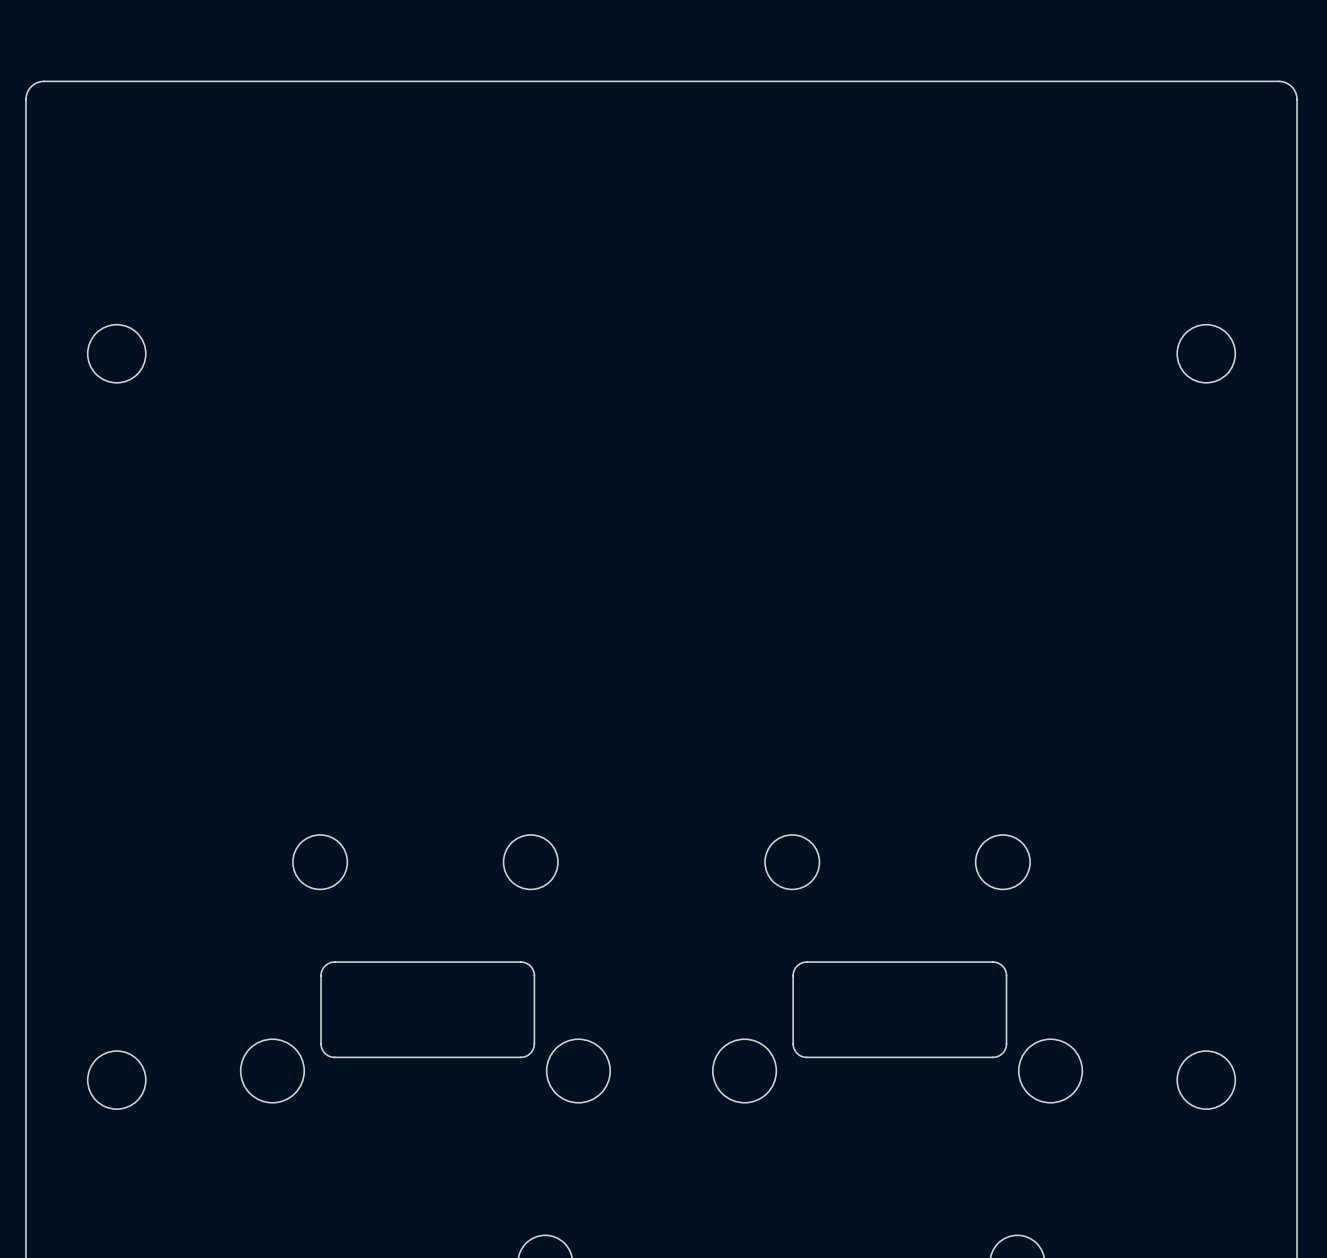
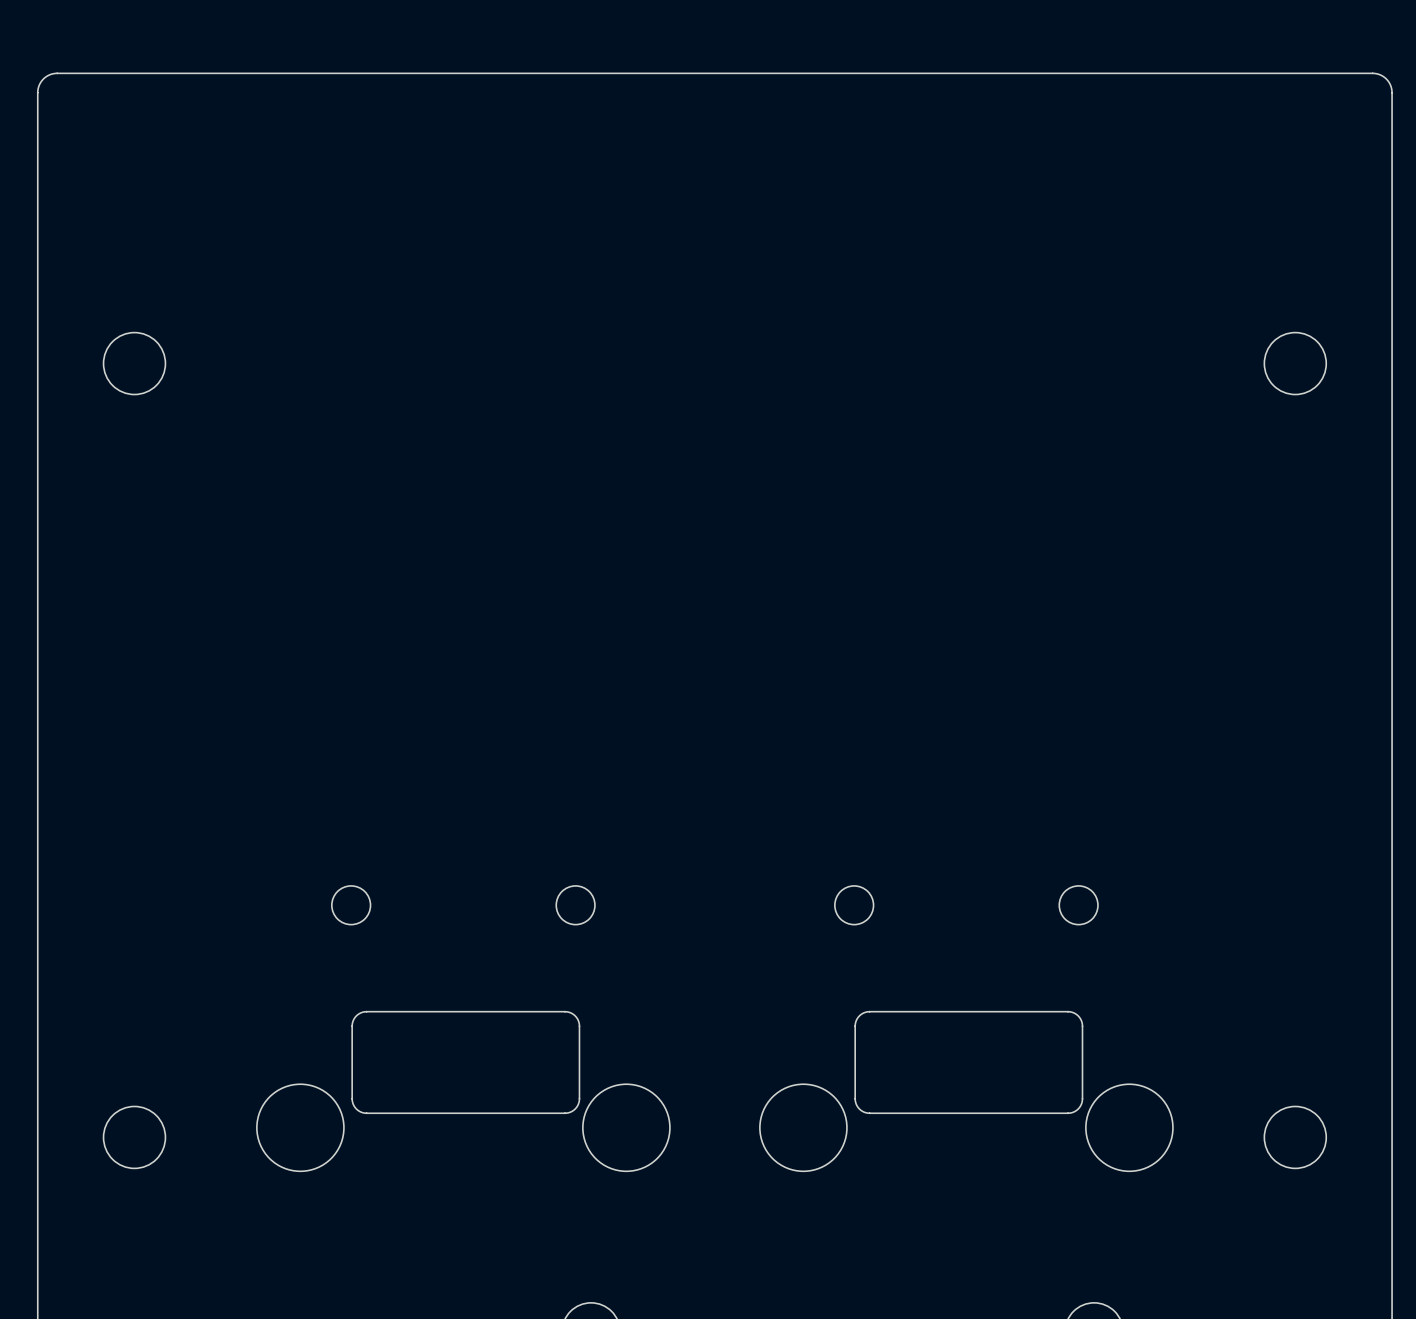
round board edge size: [292, 834, 348, 890] -> [331, 885, 372, 926]
round board edge size: [503, 834, 559, 890] -> [555, 885, 596, 926]
round board edge size: [764, 834, 820, 890] -> [834, 885, 875, 926]
round board edge size: [975, 834, 1031, 890] -> [1058, 885, 1099, 926]
round board edge size: [240, 1038, 305, 1104] -> [256, 1083, 345, 1172]
round board edge size: [546, 1038, 611, 1104] -> [582, 1083, 671, 1172]
round board edge size: [712, 1038, 777, 1104] -> [759, 1083, 848, 1172]
round board edge size: [1018, 1038, 1083, 1104] -> [1085, 1083, 1174, 1172]

